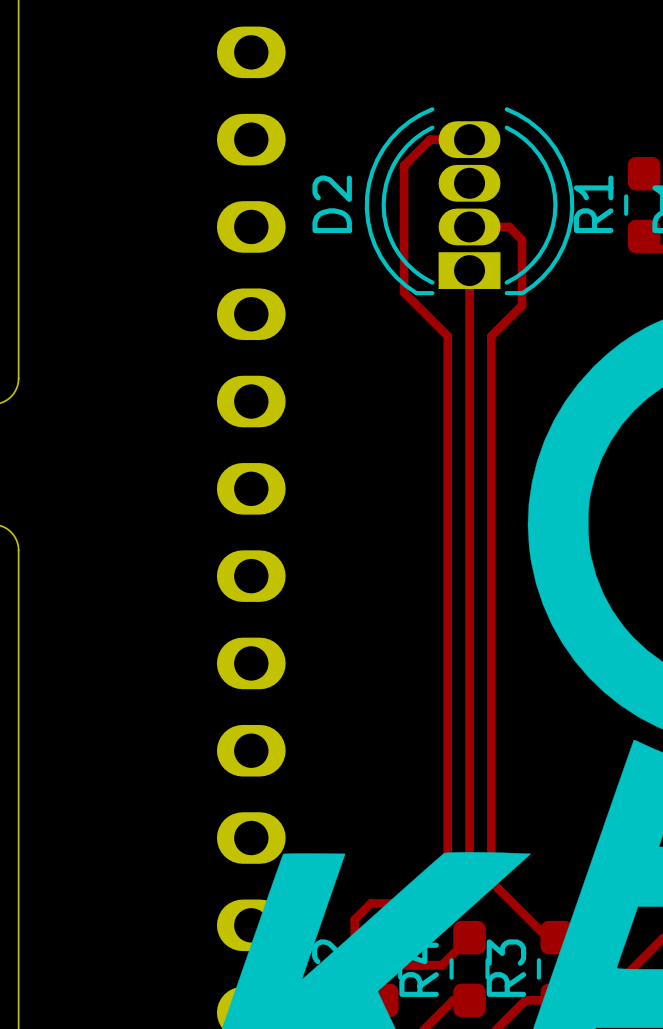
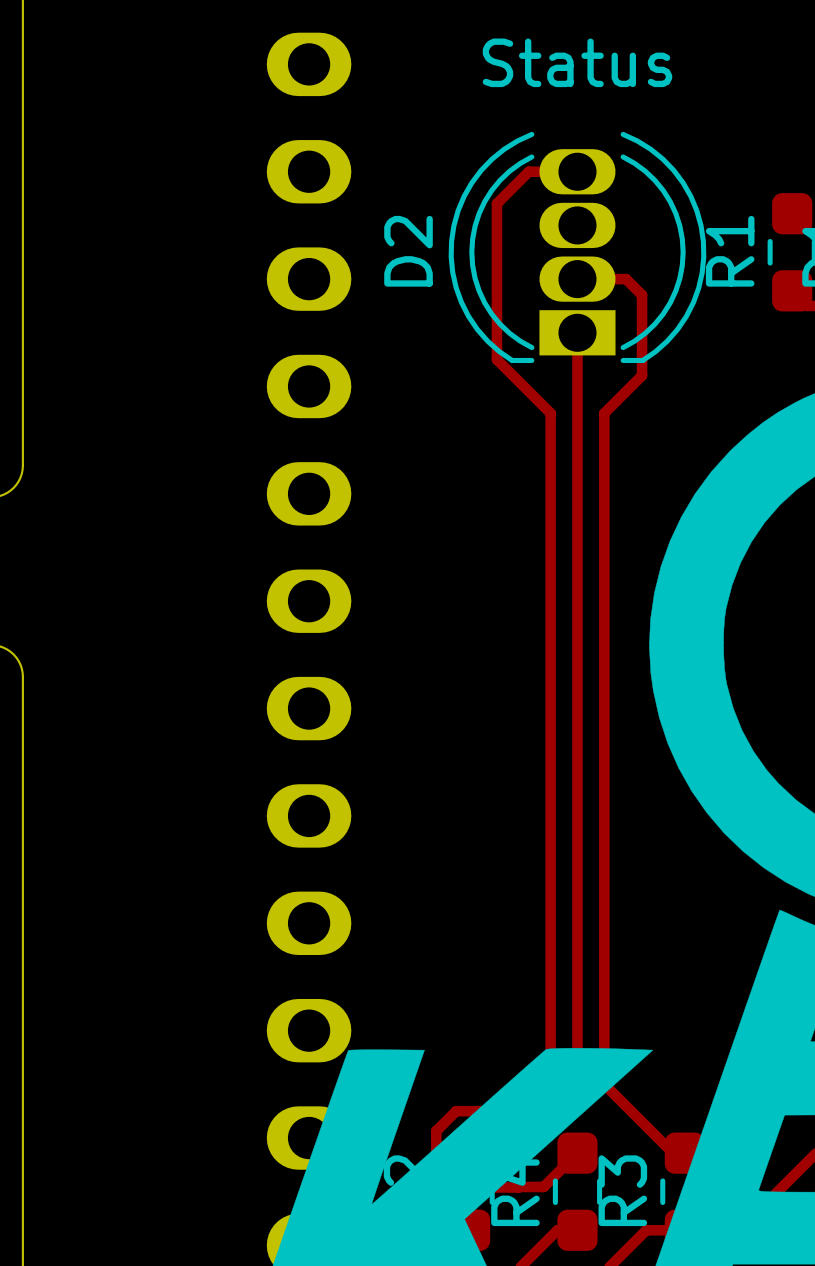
text: none -> Status (577, 62)

